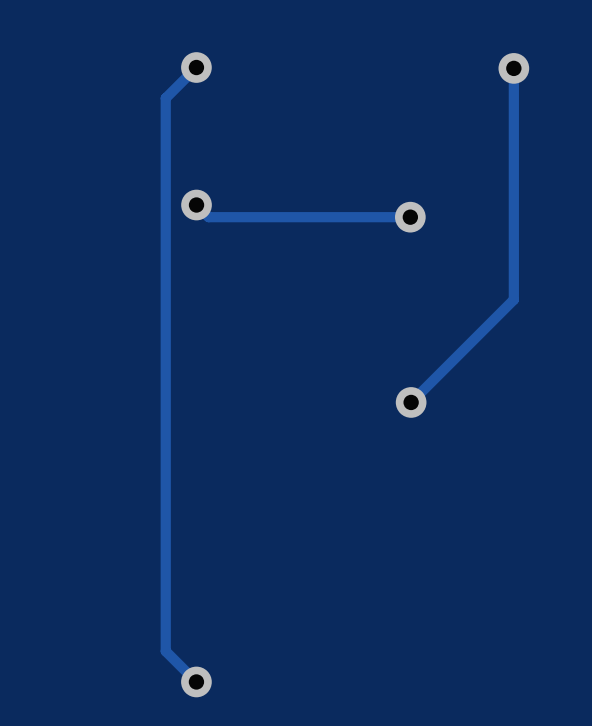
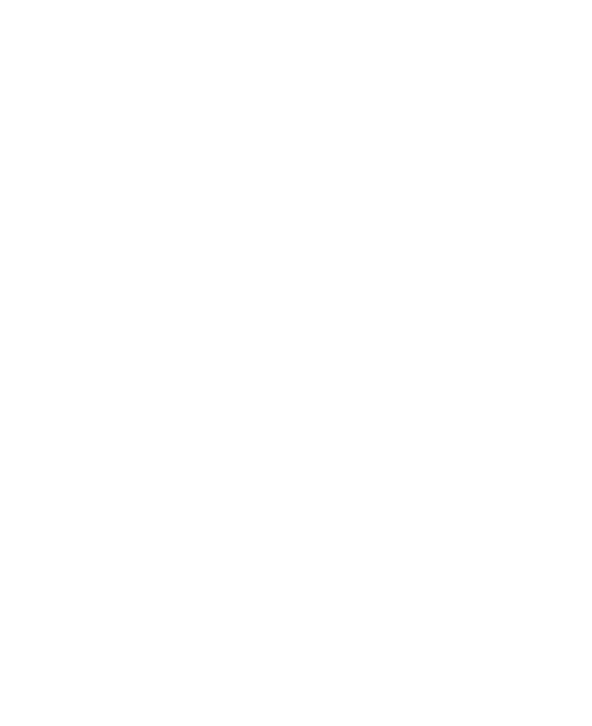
track: (196, 67) (165, 98) (165, 651) (196, 681) -> none
via: (196, 67) -> none
track: (513, 68) (513, 299) (411, 402) -> none
via: (513, 68) -> none
track: (196, 205) (208, 217) (410, 217) -> none
via: (196, 205) -> none
via: (410, 217) -> none
via: (411, 402) -> none
via: (196, 681) -> none

